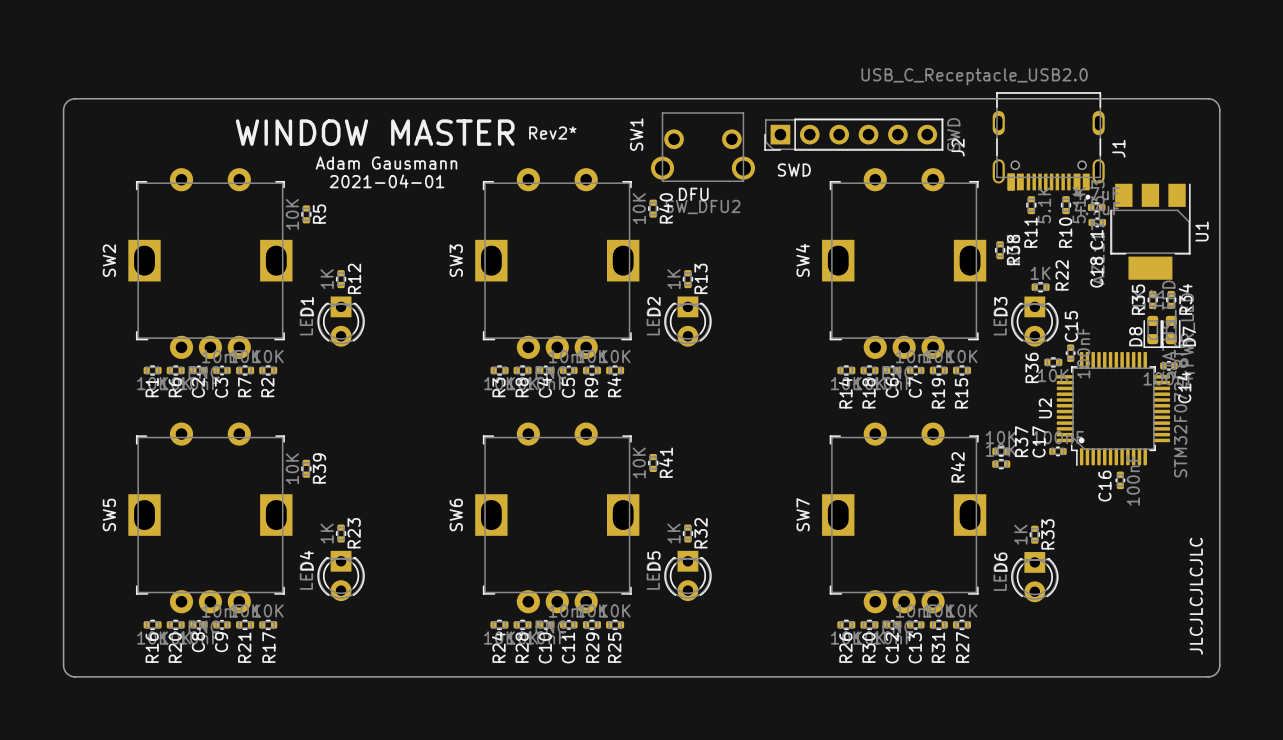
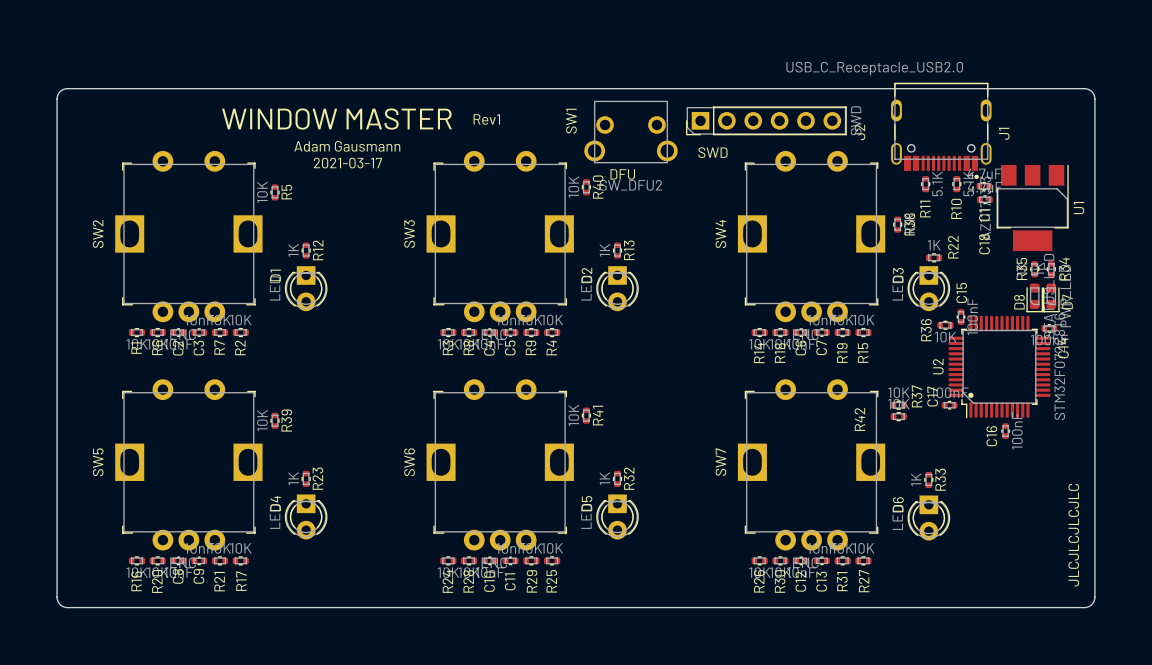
text: Rev2* (552, 133) -> Rev1 (486, 119)
text: 2021-04-01 (387, 181) -> 2021-03-17 (347, 163)

